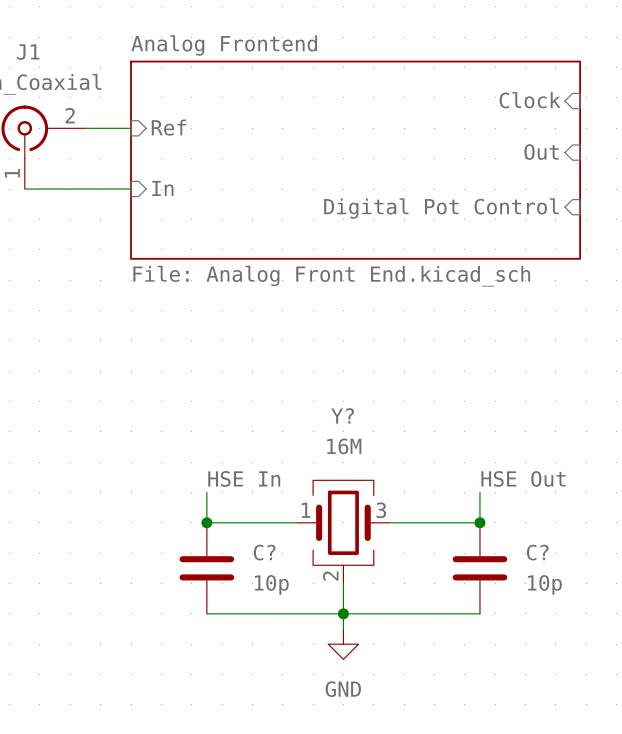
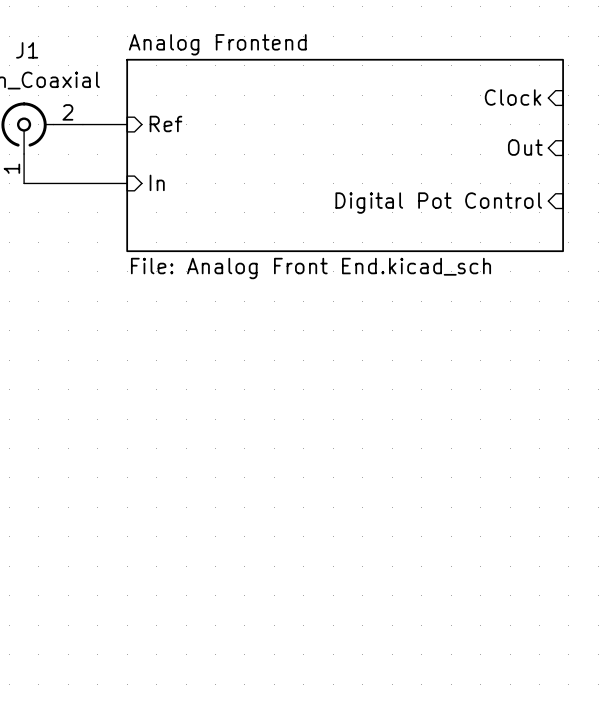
label: HSE In (244, 478) -> none
label: HSE Out (523, 478) -> none
wire: (206, 492) (206, 522) (297, 522) -> none
wire: (479, 492) (479, 522) (388, 522) -> none
junction: (206, 522) -> none
junction: (479, 522) -> none
Y?: 16M (343, 531) -> none
C?: 10p (206, 568) -> none
C?: 10p (479, 568) -> none
wire: (343, 583) (343, 629) -> none
wire: (206, 613) (479, 613) -> none
junction: (343, 613) -> none
power symbol: GND (343, 644) -> none

